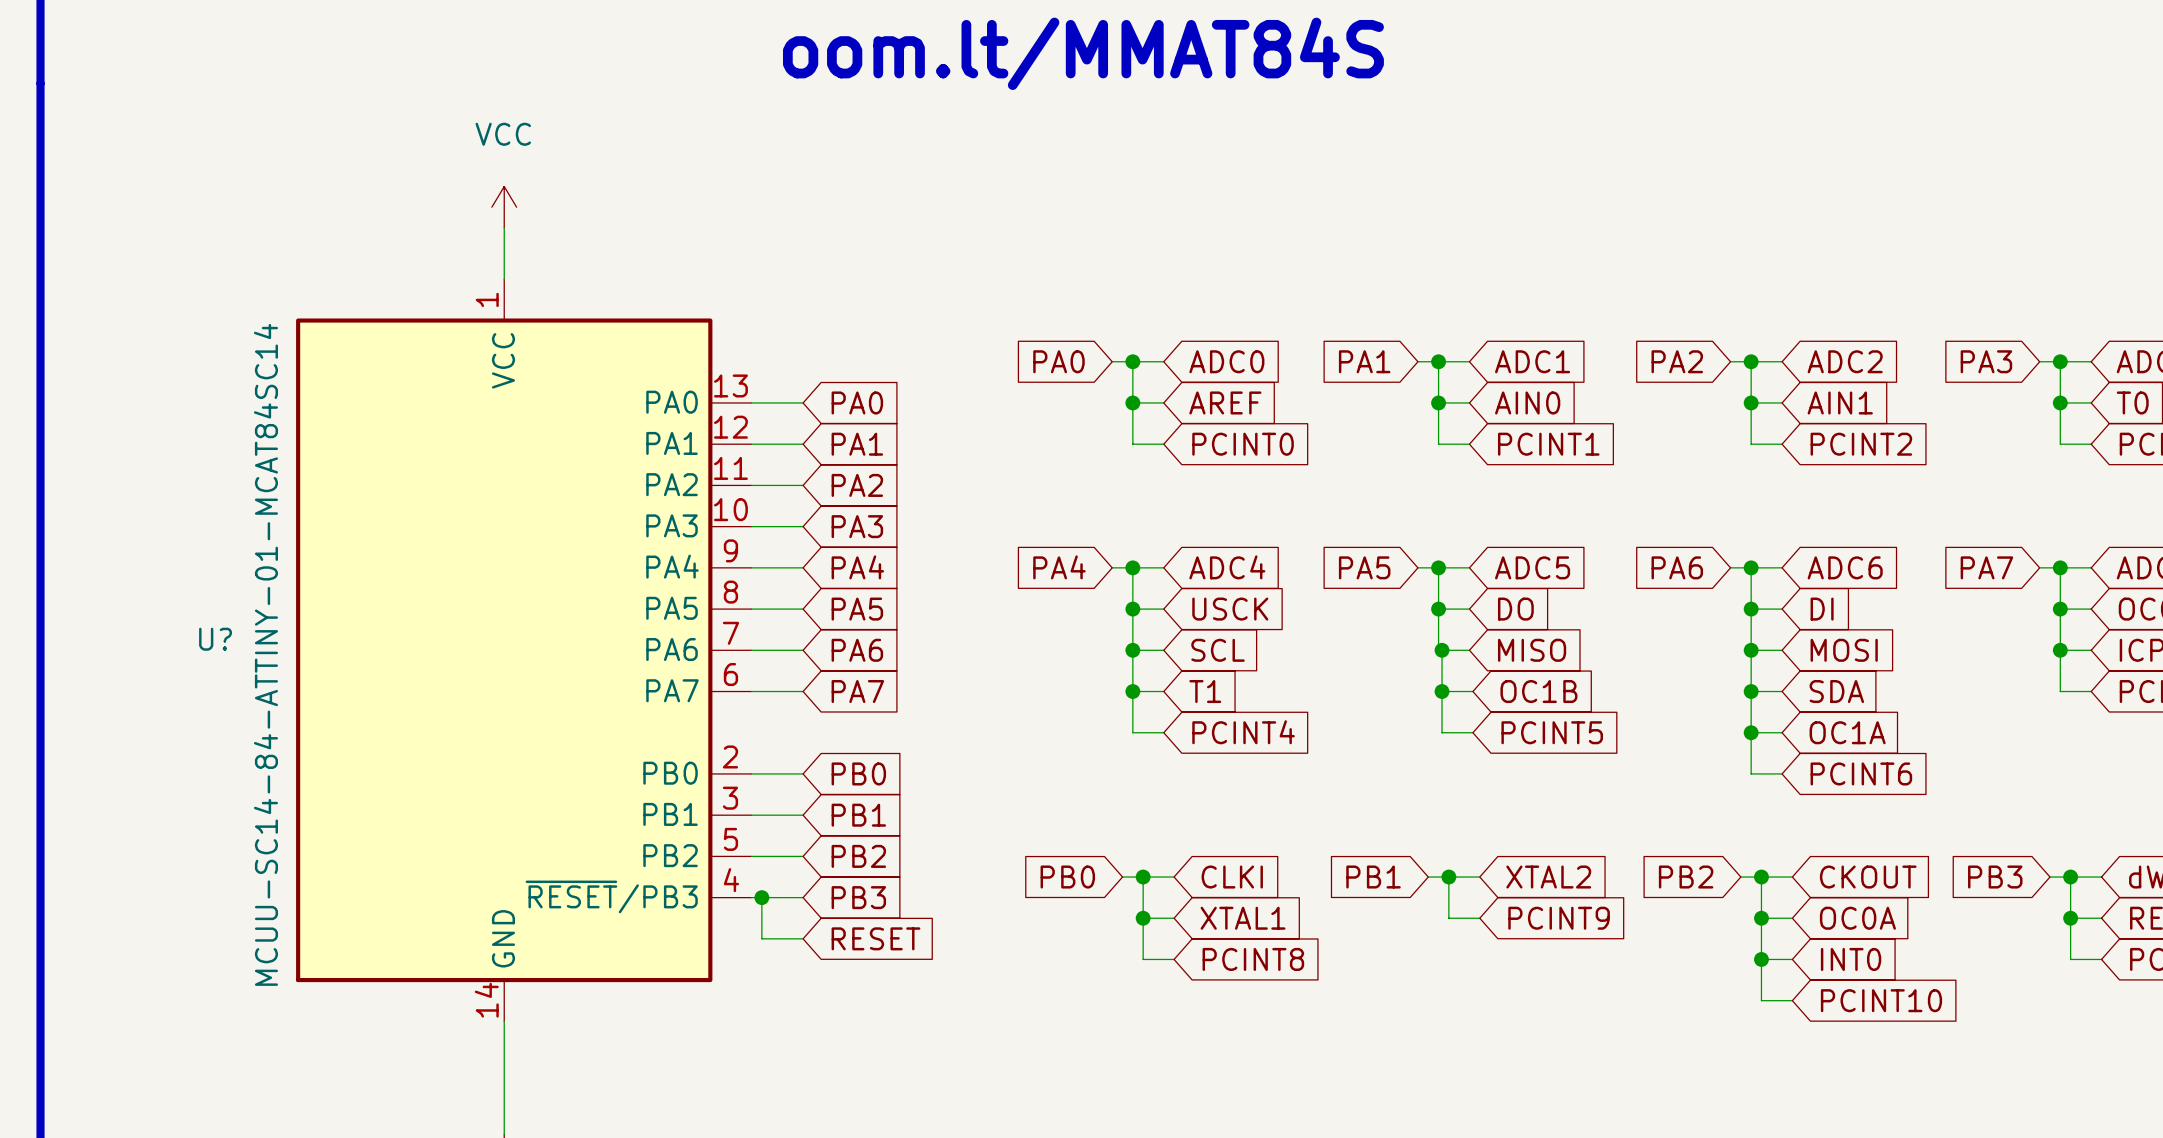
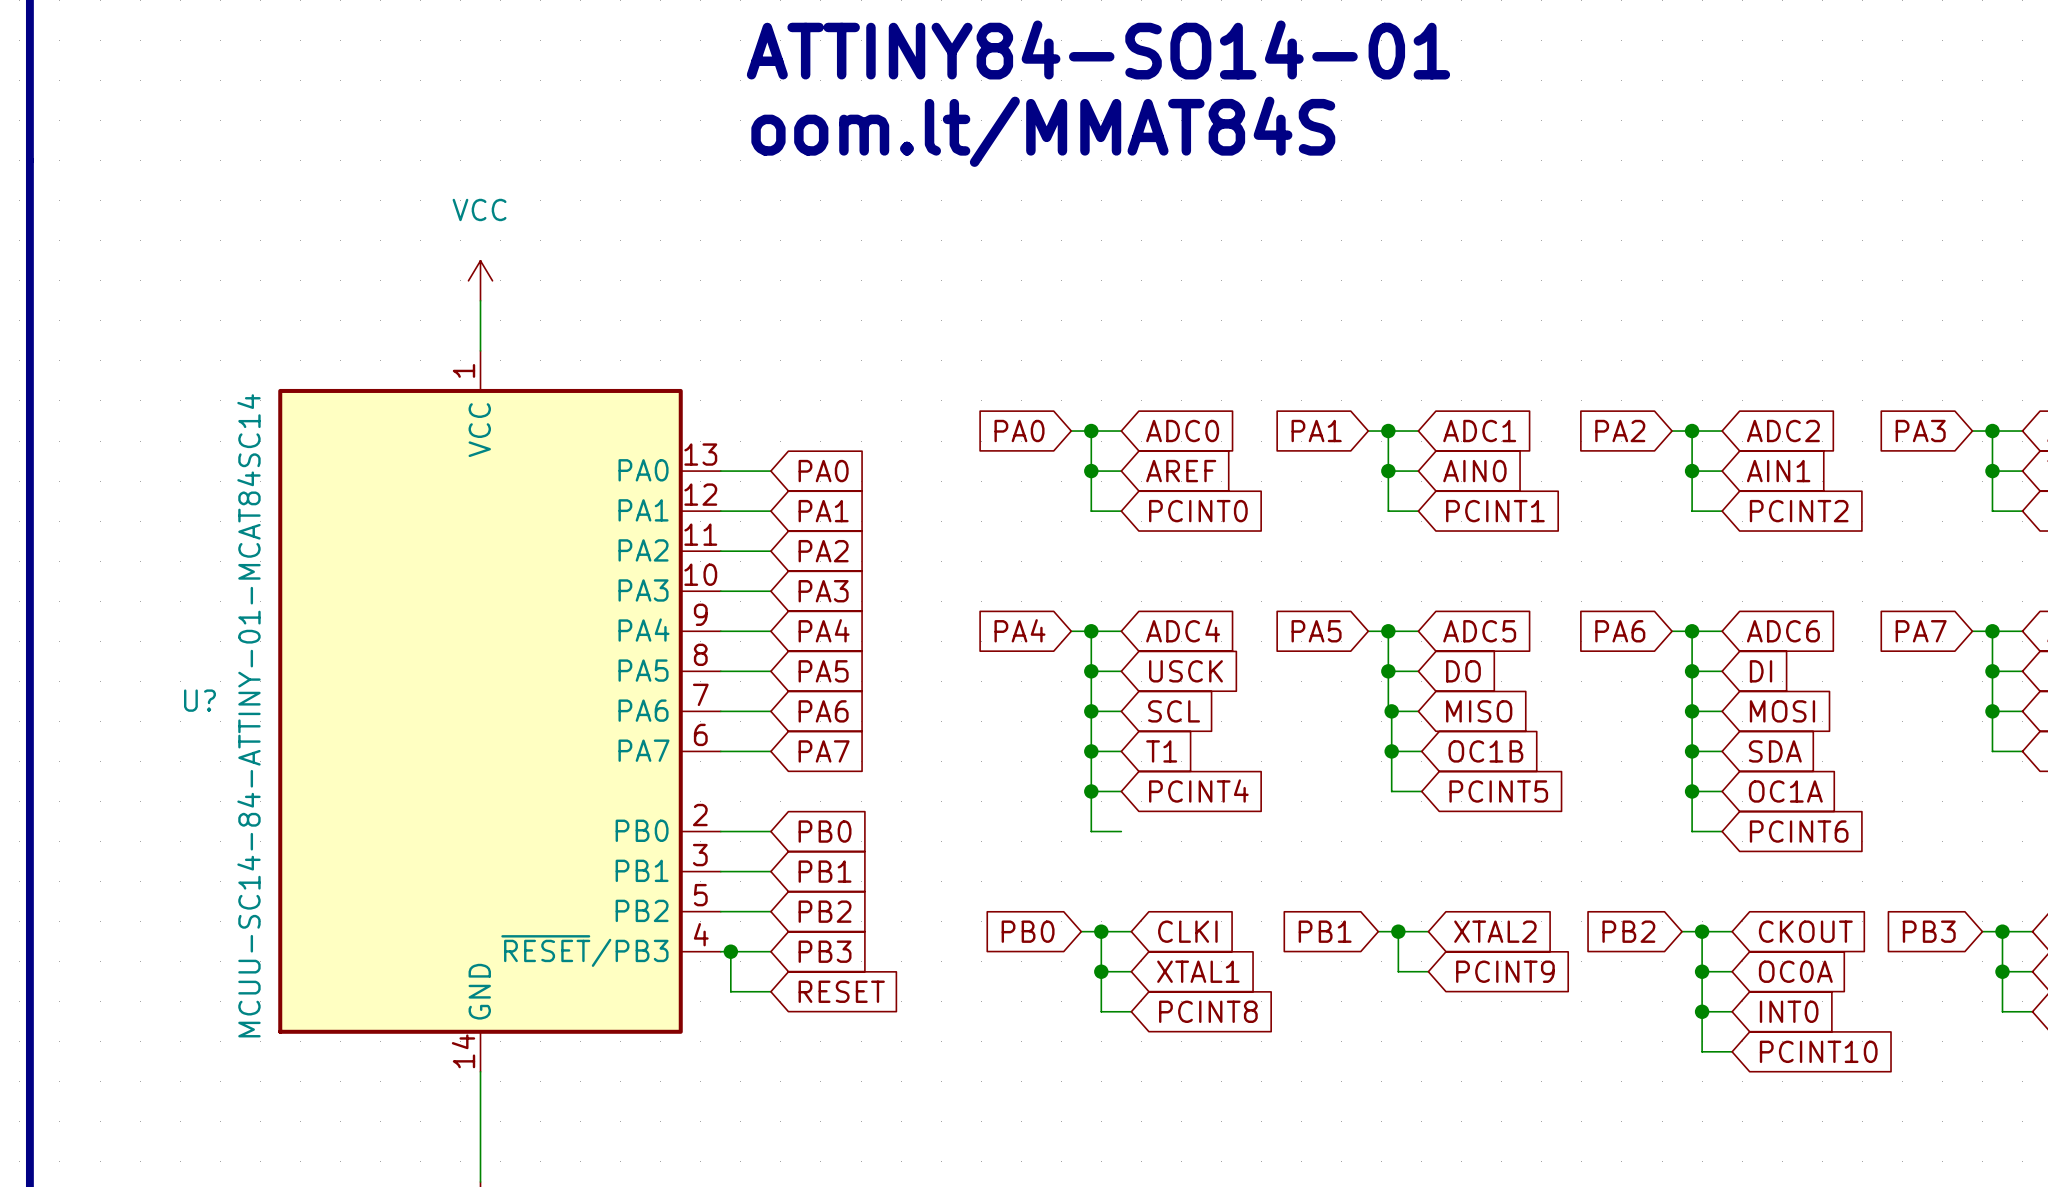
wire: none -> (1091, 791) (1091, 831) (1121, 831)
junction: none -> (1091, 791)

